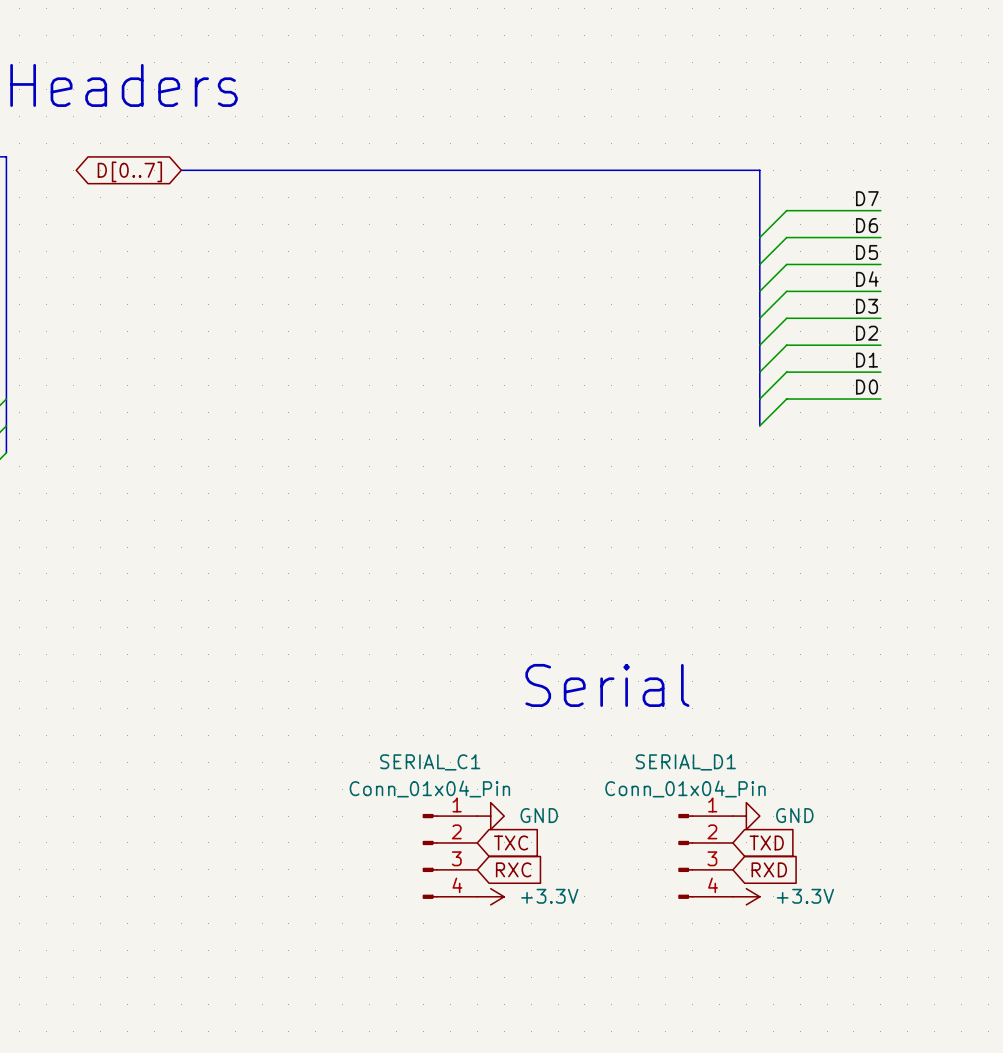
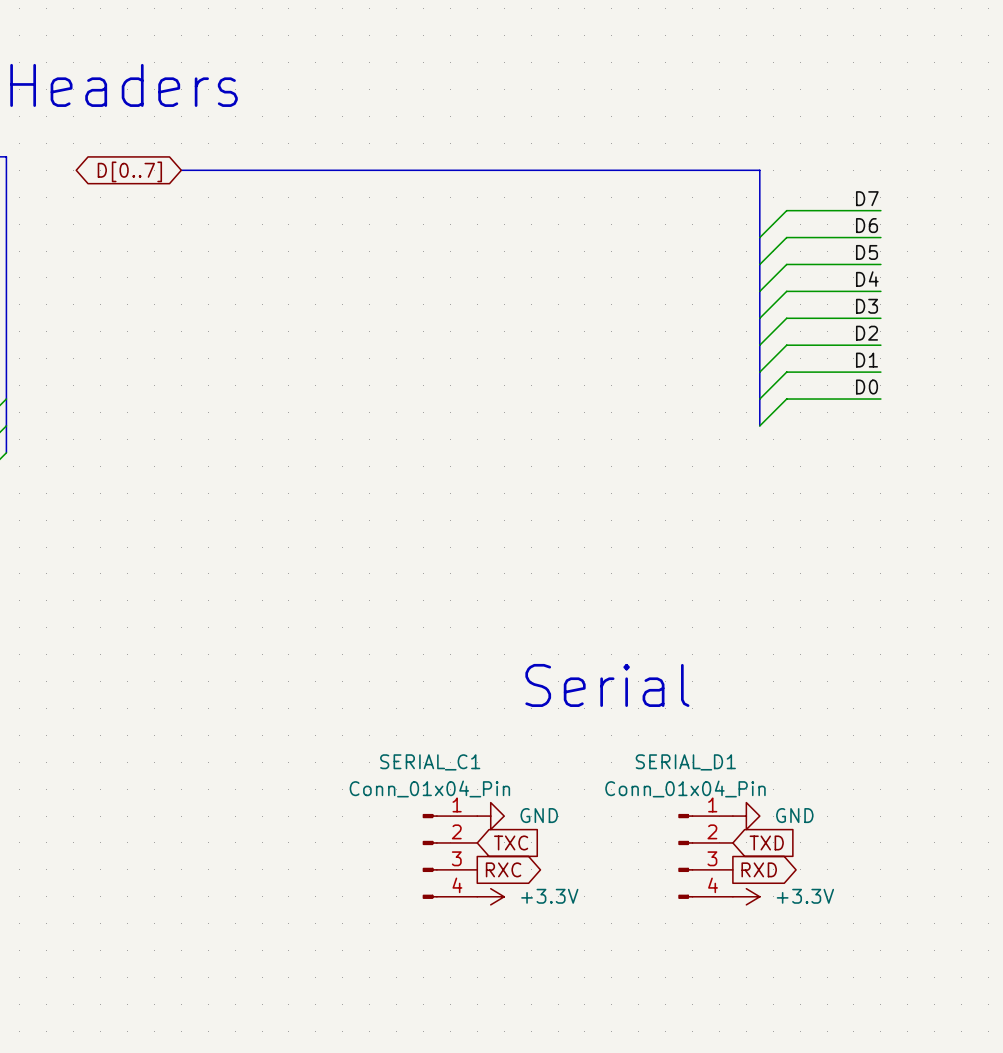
global label shape: input (513, 869) -> output (503, 869)
global label shape: input (769, 869) -> output (759, 869)

